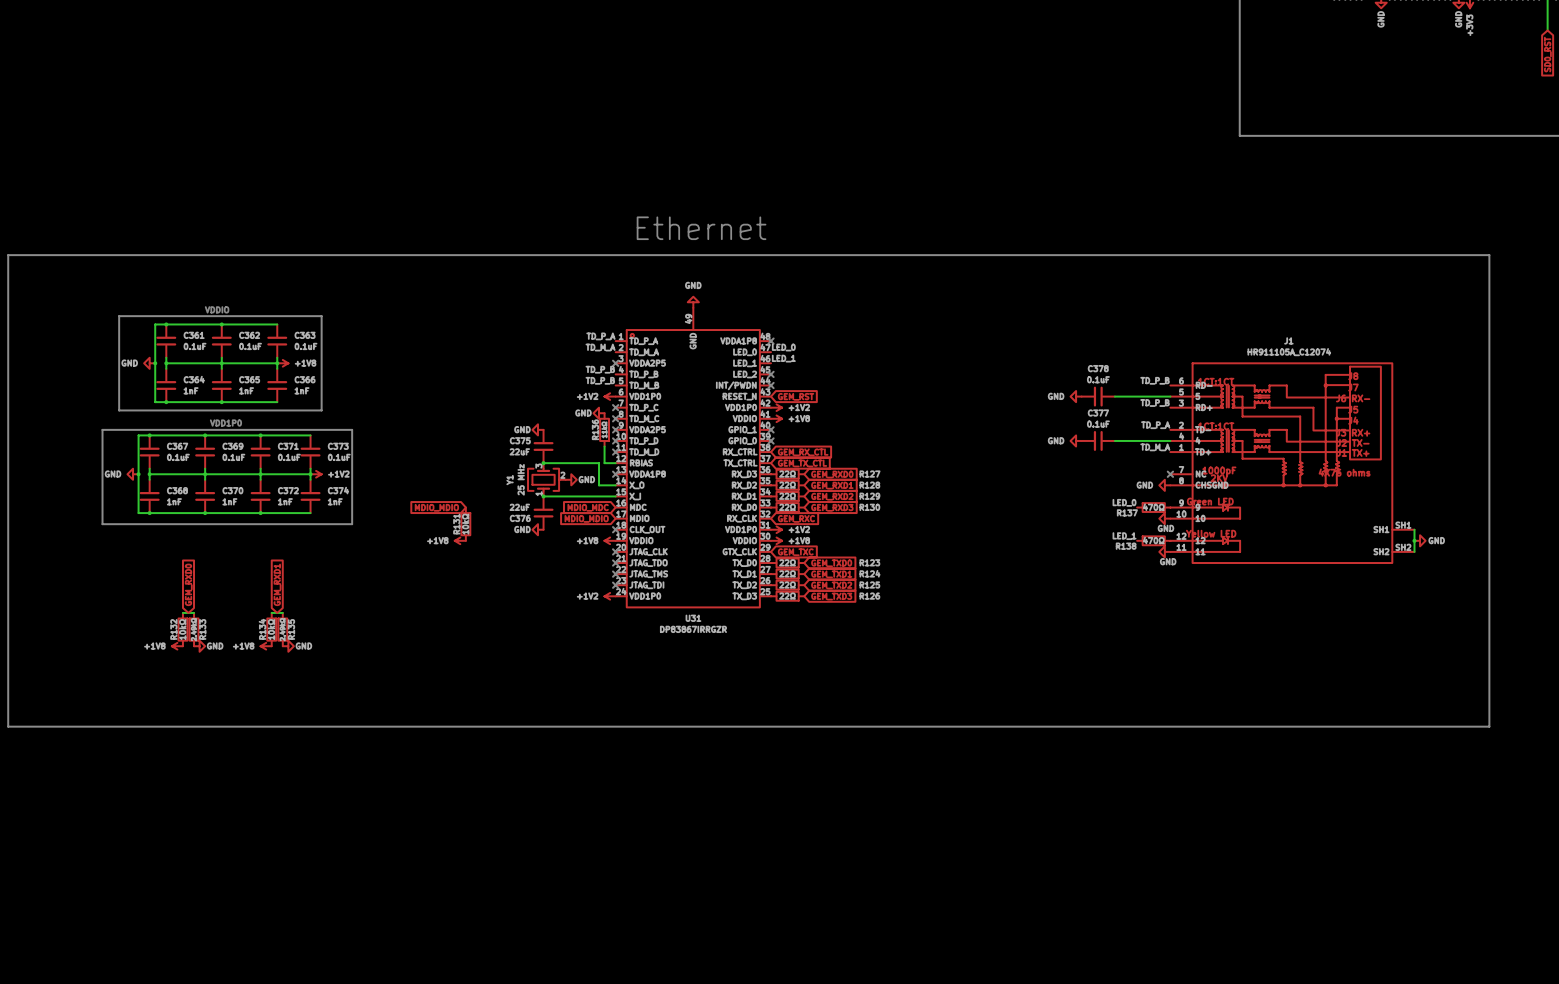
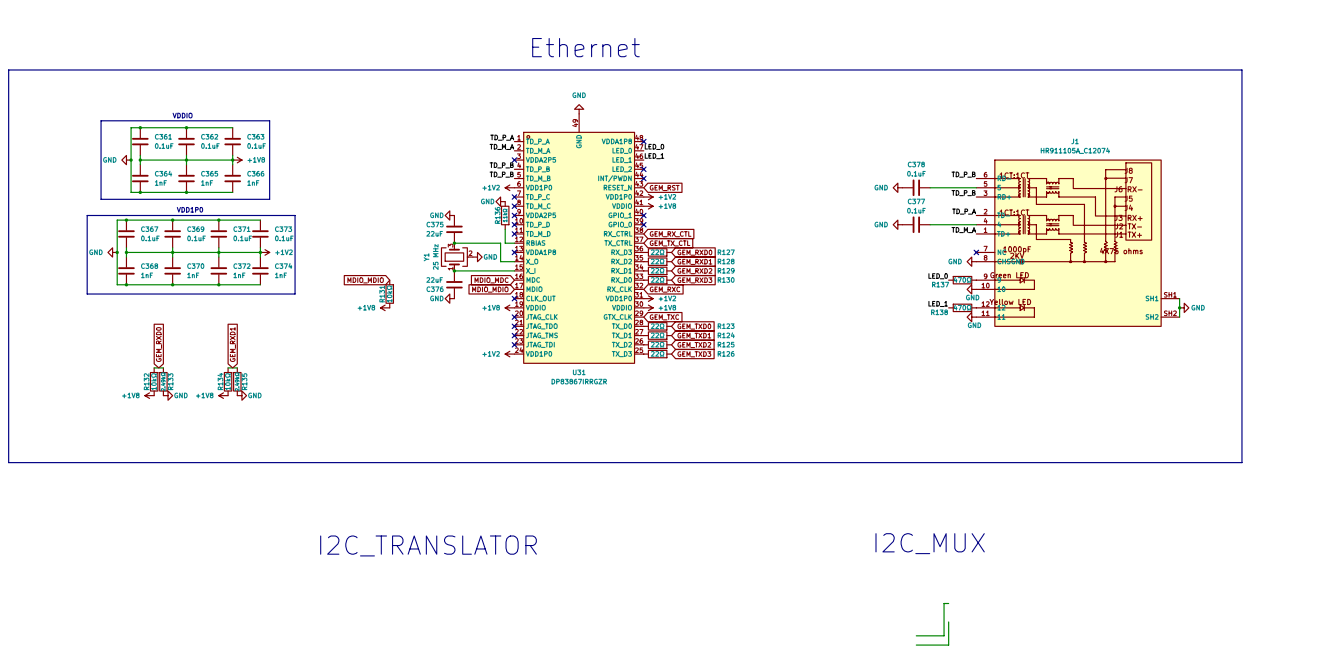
text: none -> I2C_MUX (930, 543)
text: none -> I2C_TRANSLATOR (428, 545)
wire: none -> (948, 603) (944, 603) (944, 635) (916, 635)
wire: none -> (948, 621) (948, 645) (916, 645)

